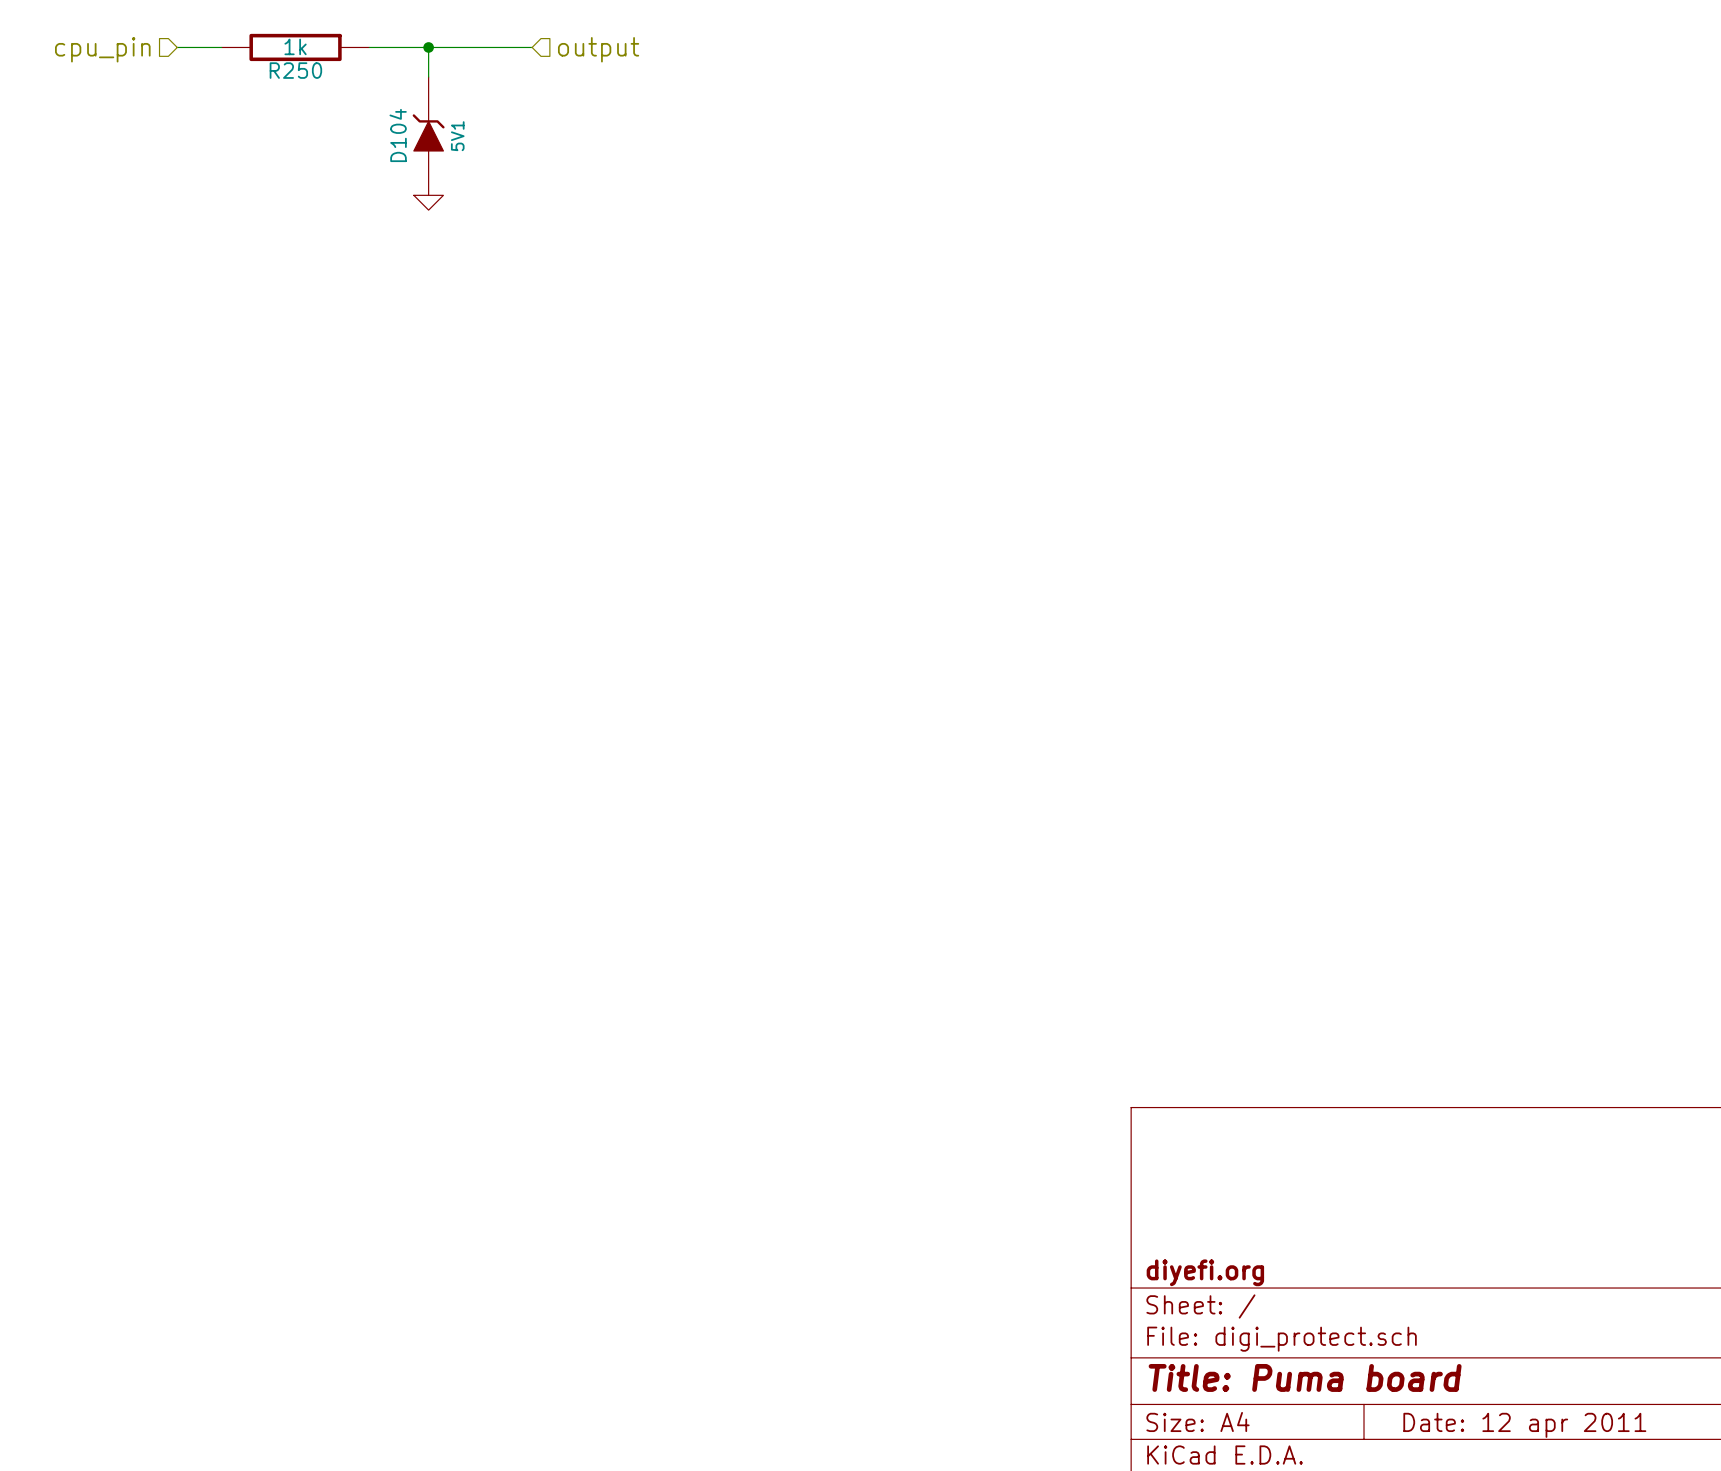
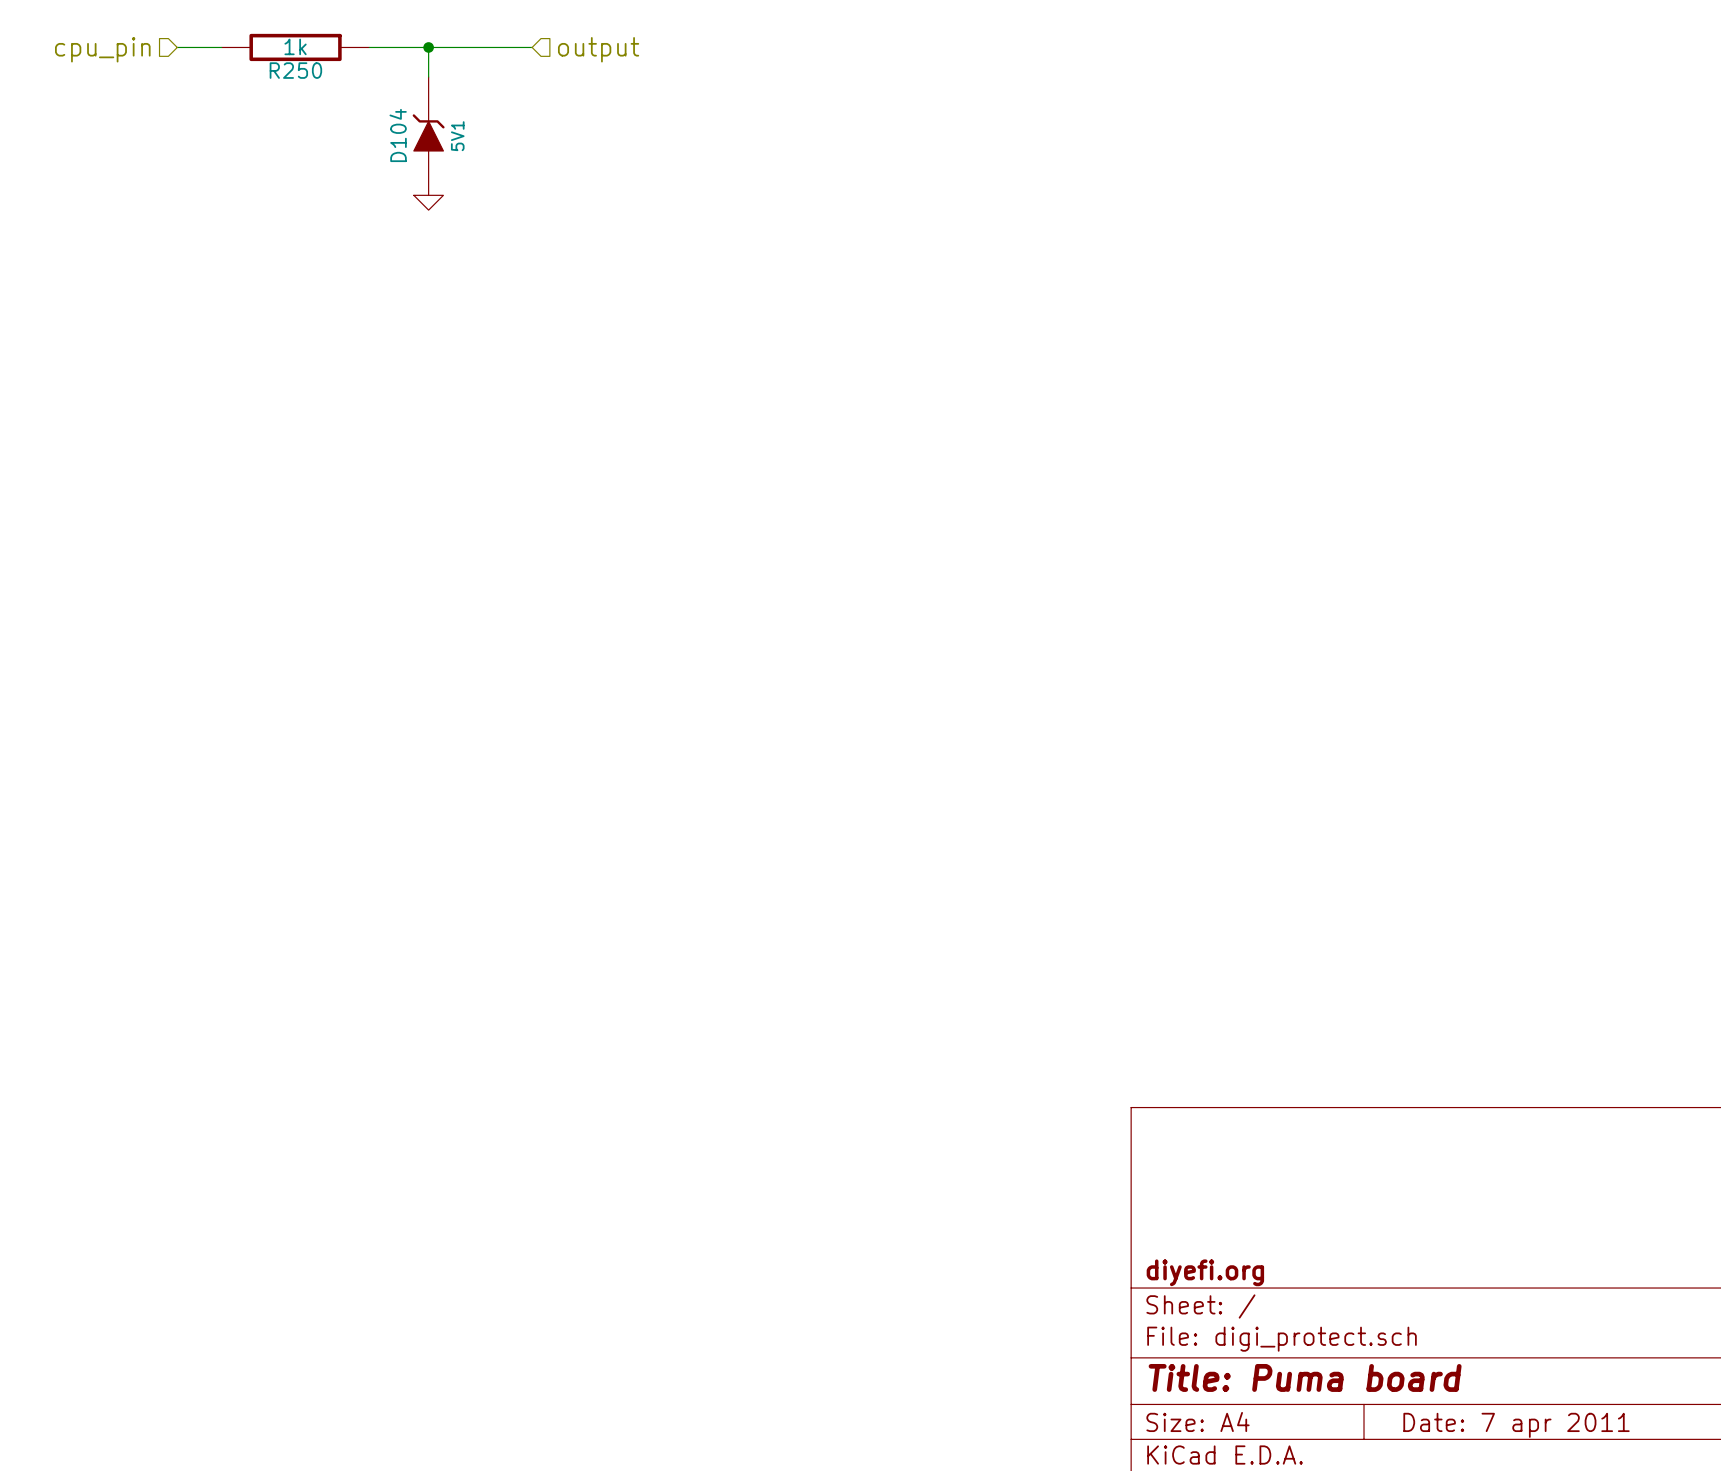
title block: Date: 12 apr 2011 (1524, 1425) -> Date: 7 apr 2011 (1516, 1425)

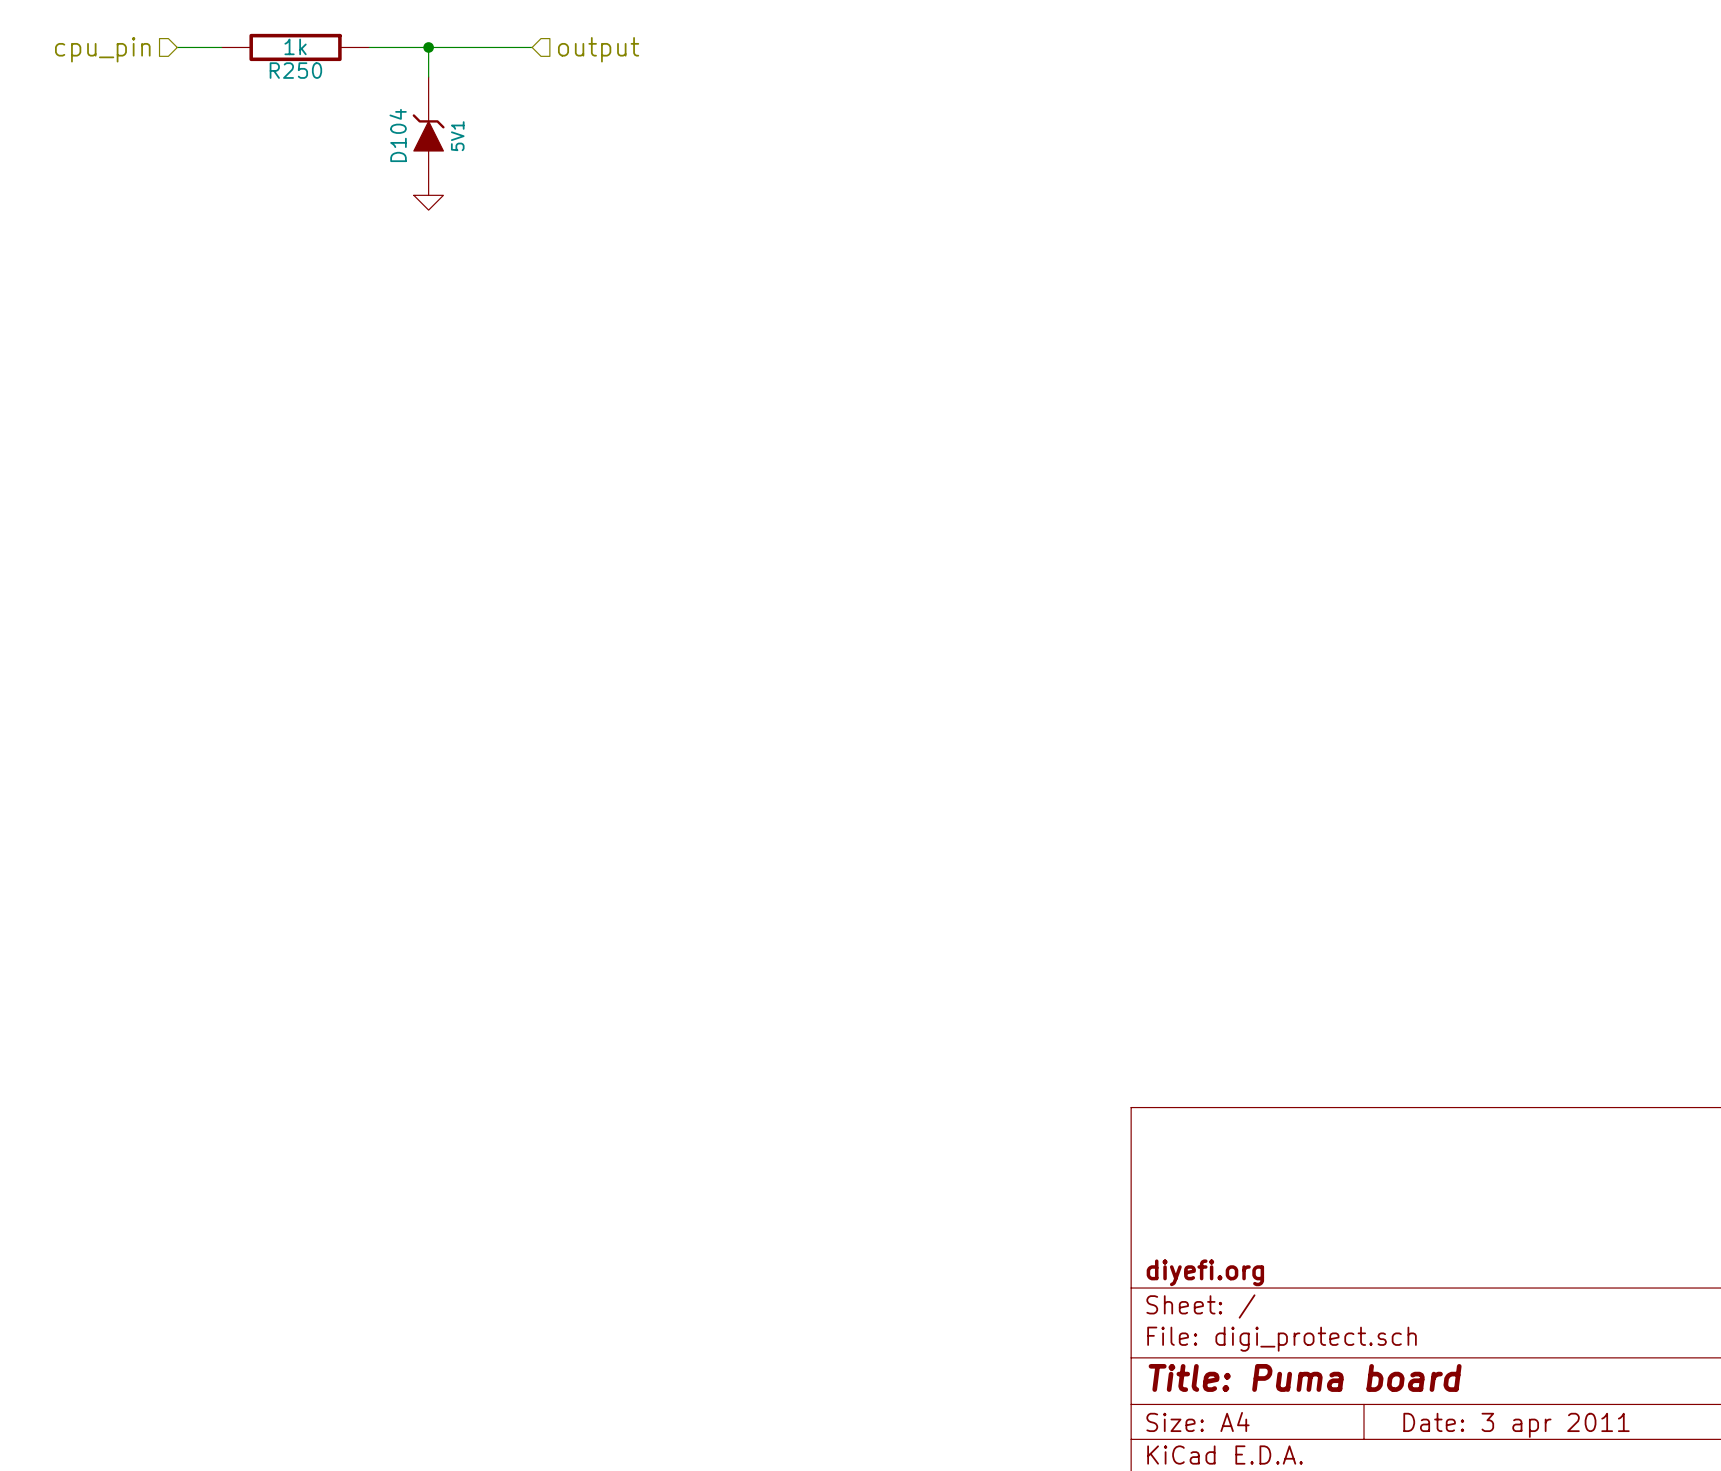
title block: Date: 7 apr 2011 (1516, 1425) -> Date: 3 apr 2011 (1516, 1425)

